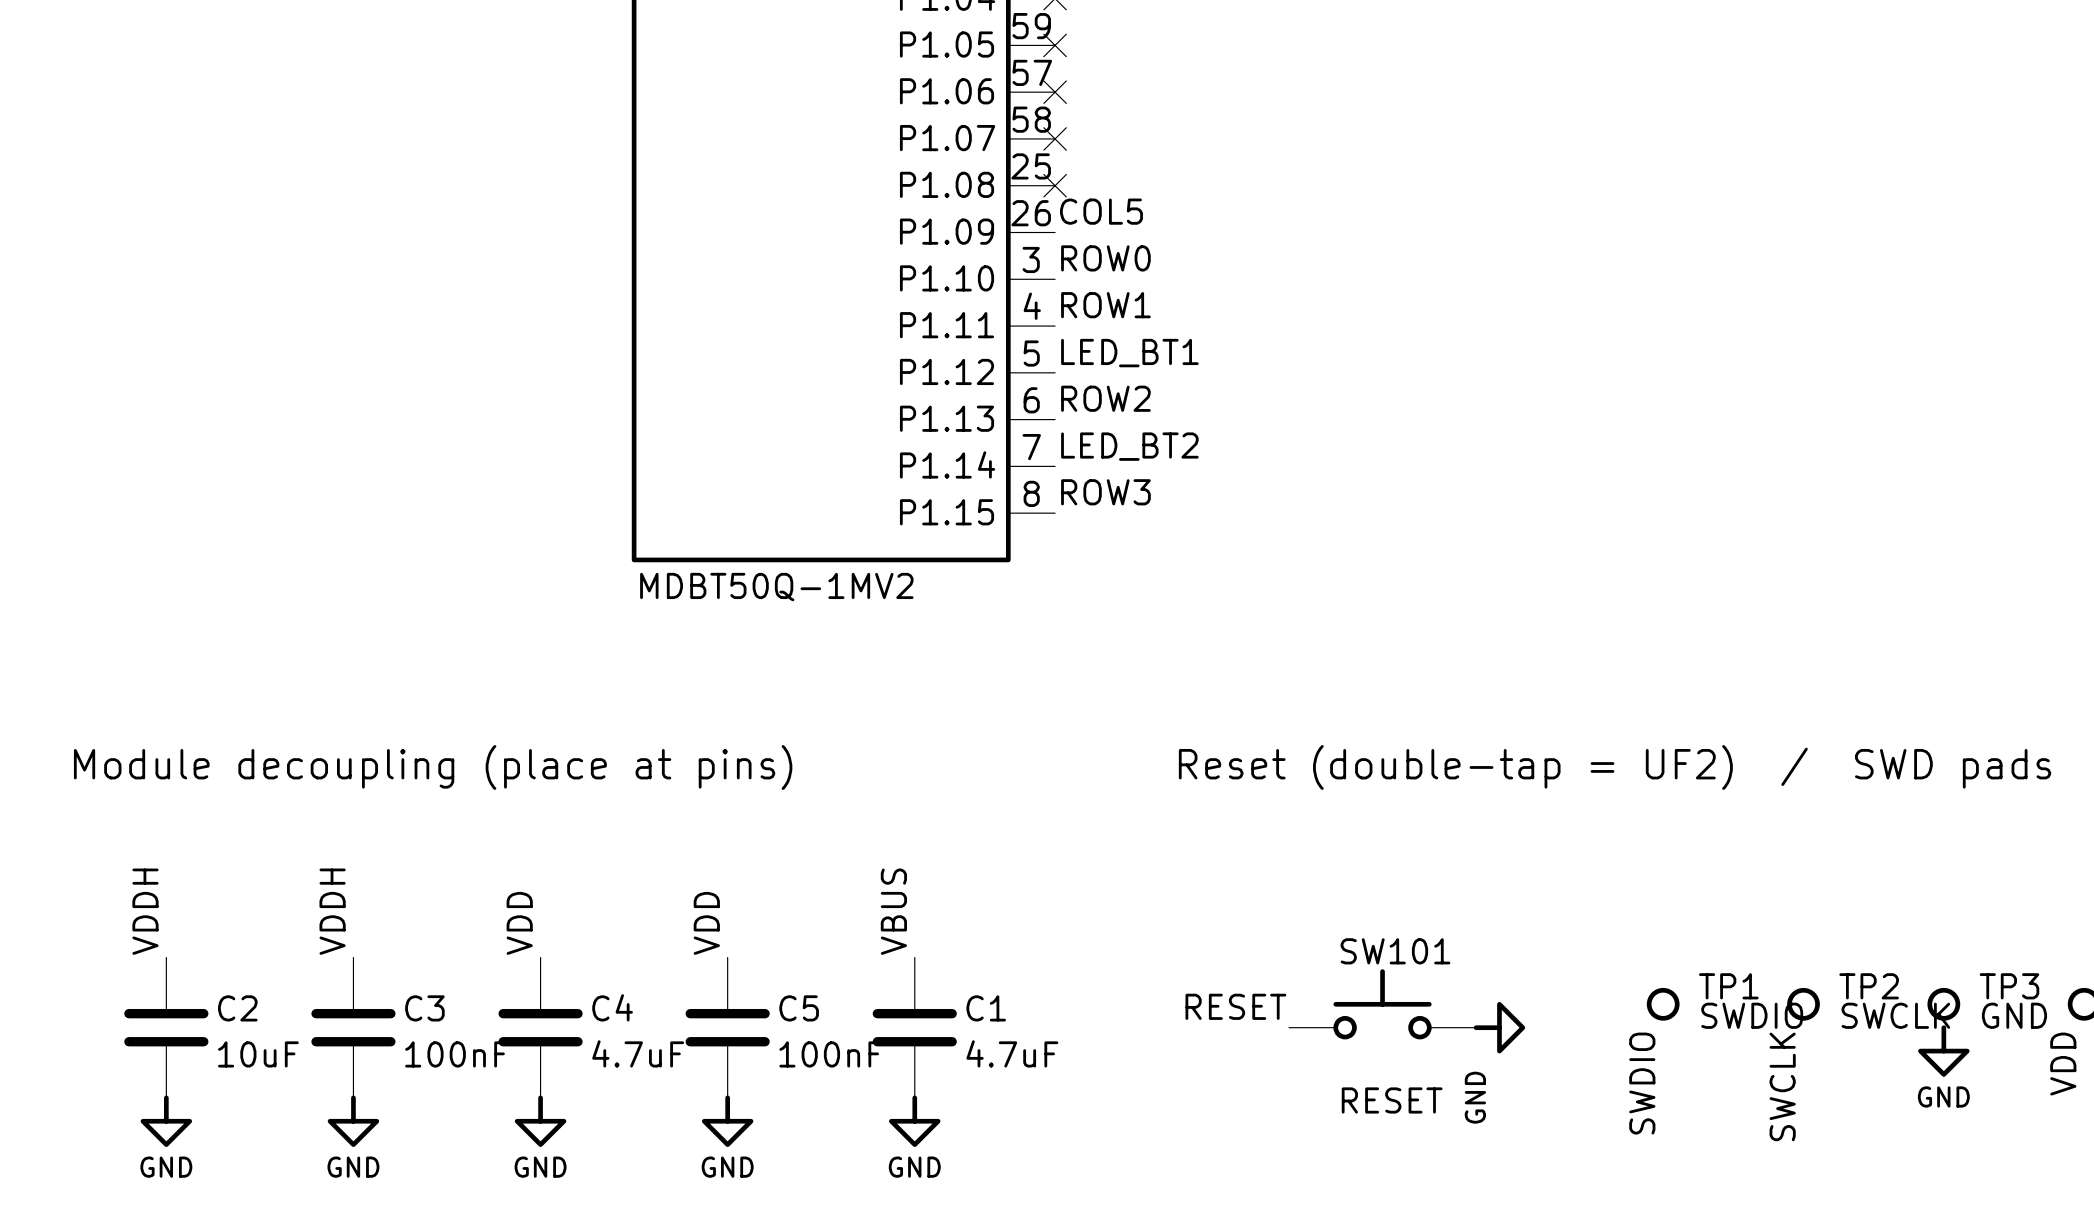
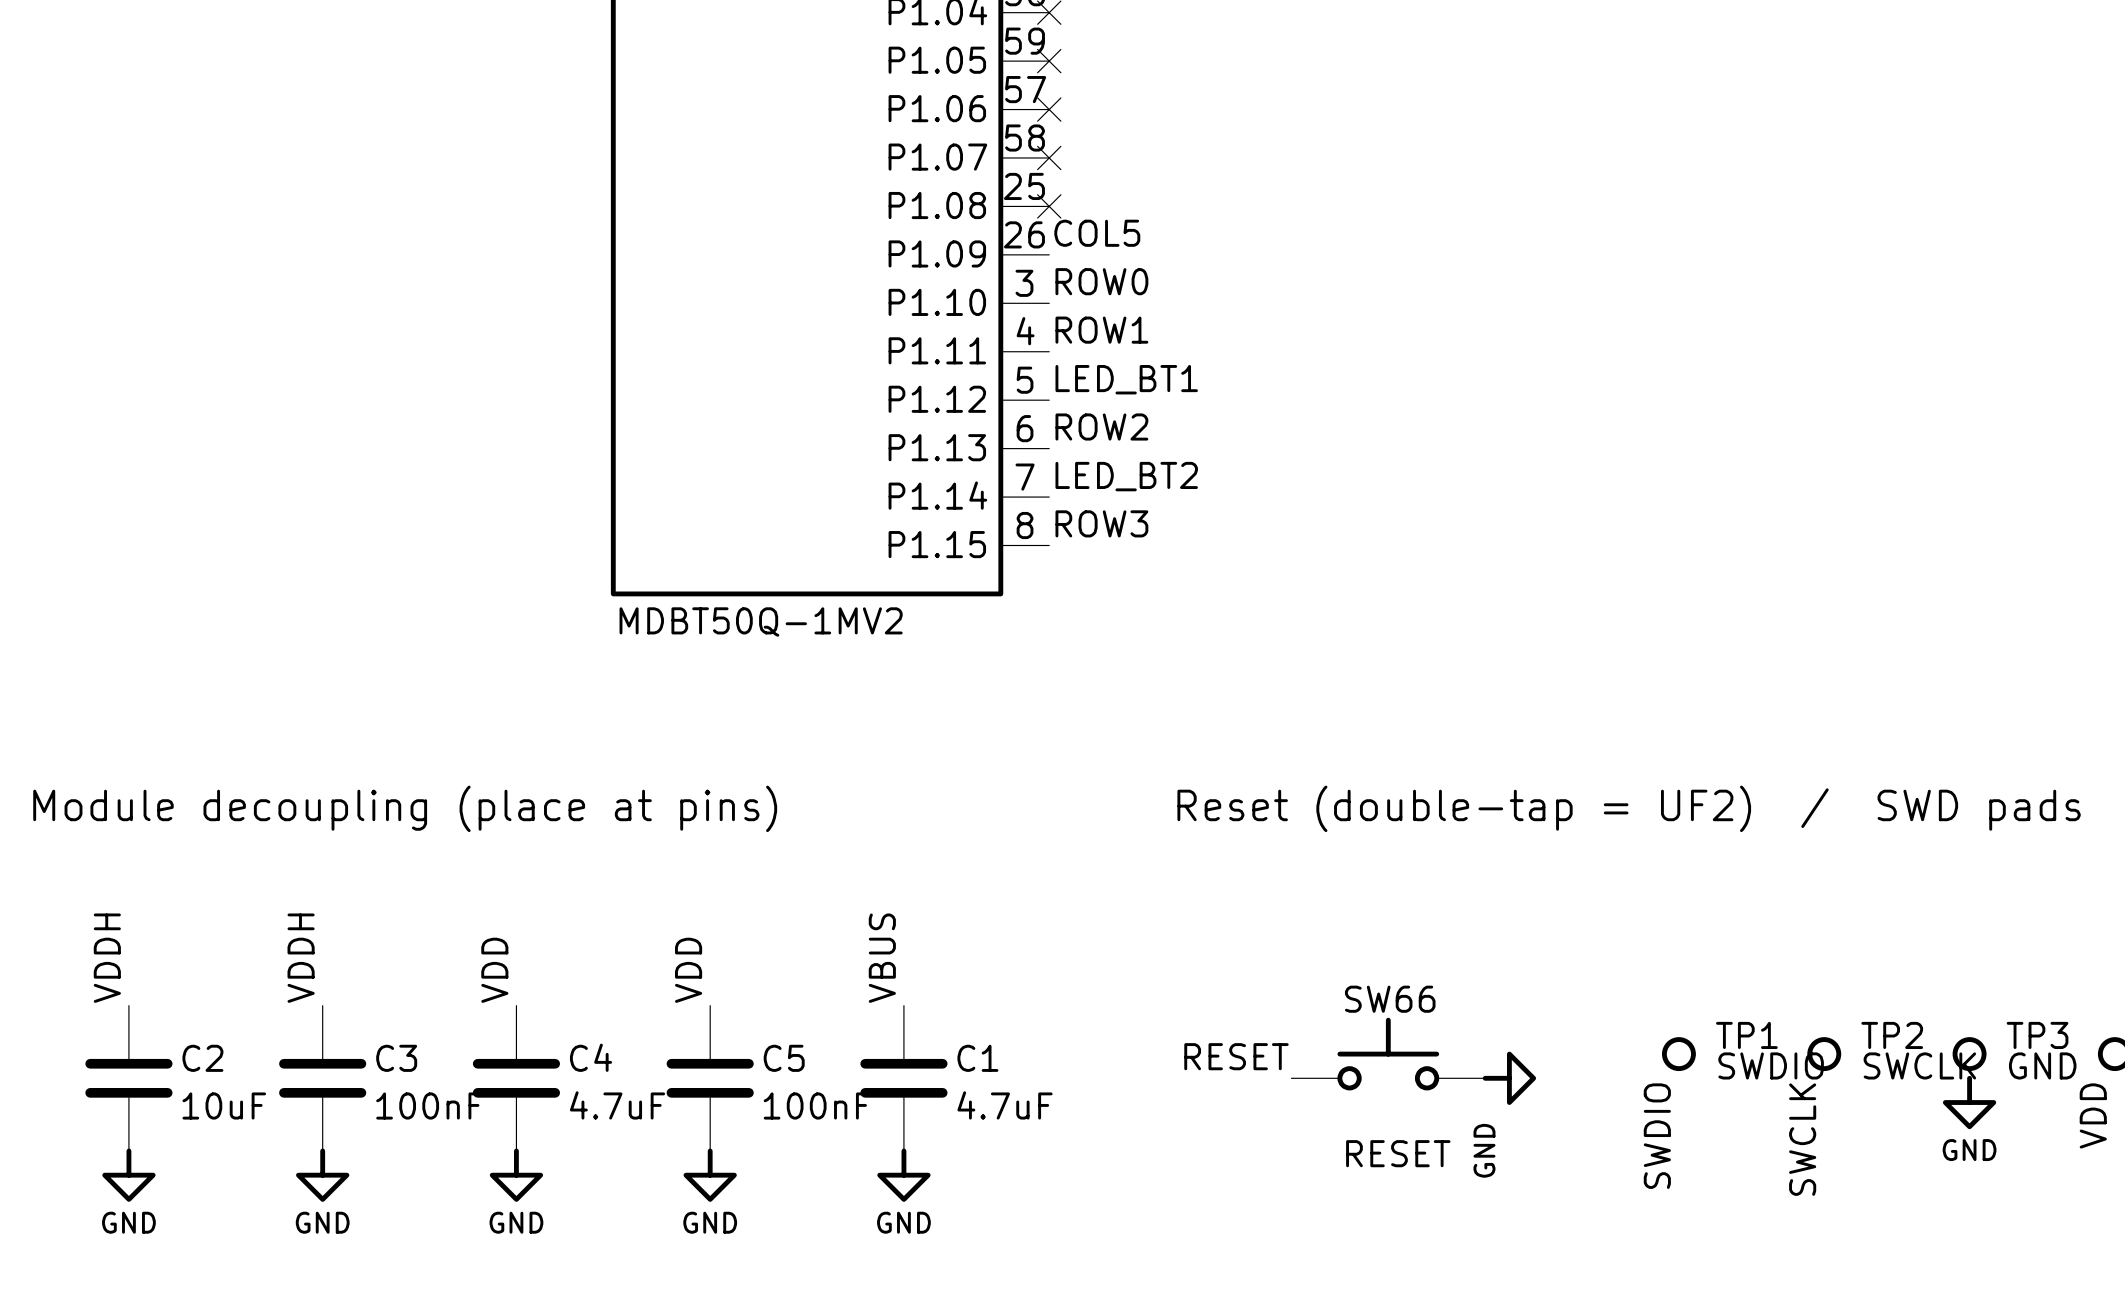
SW101 name: SW101 (1395, 951) -> SW66 (1390, 999)

